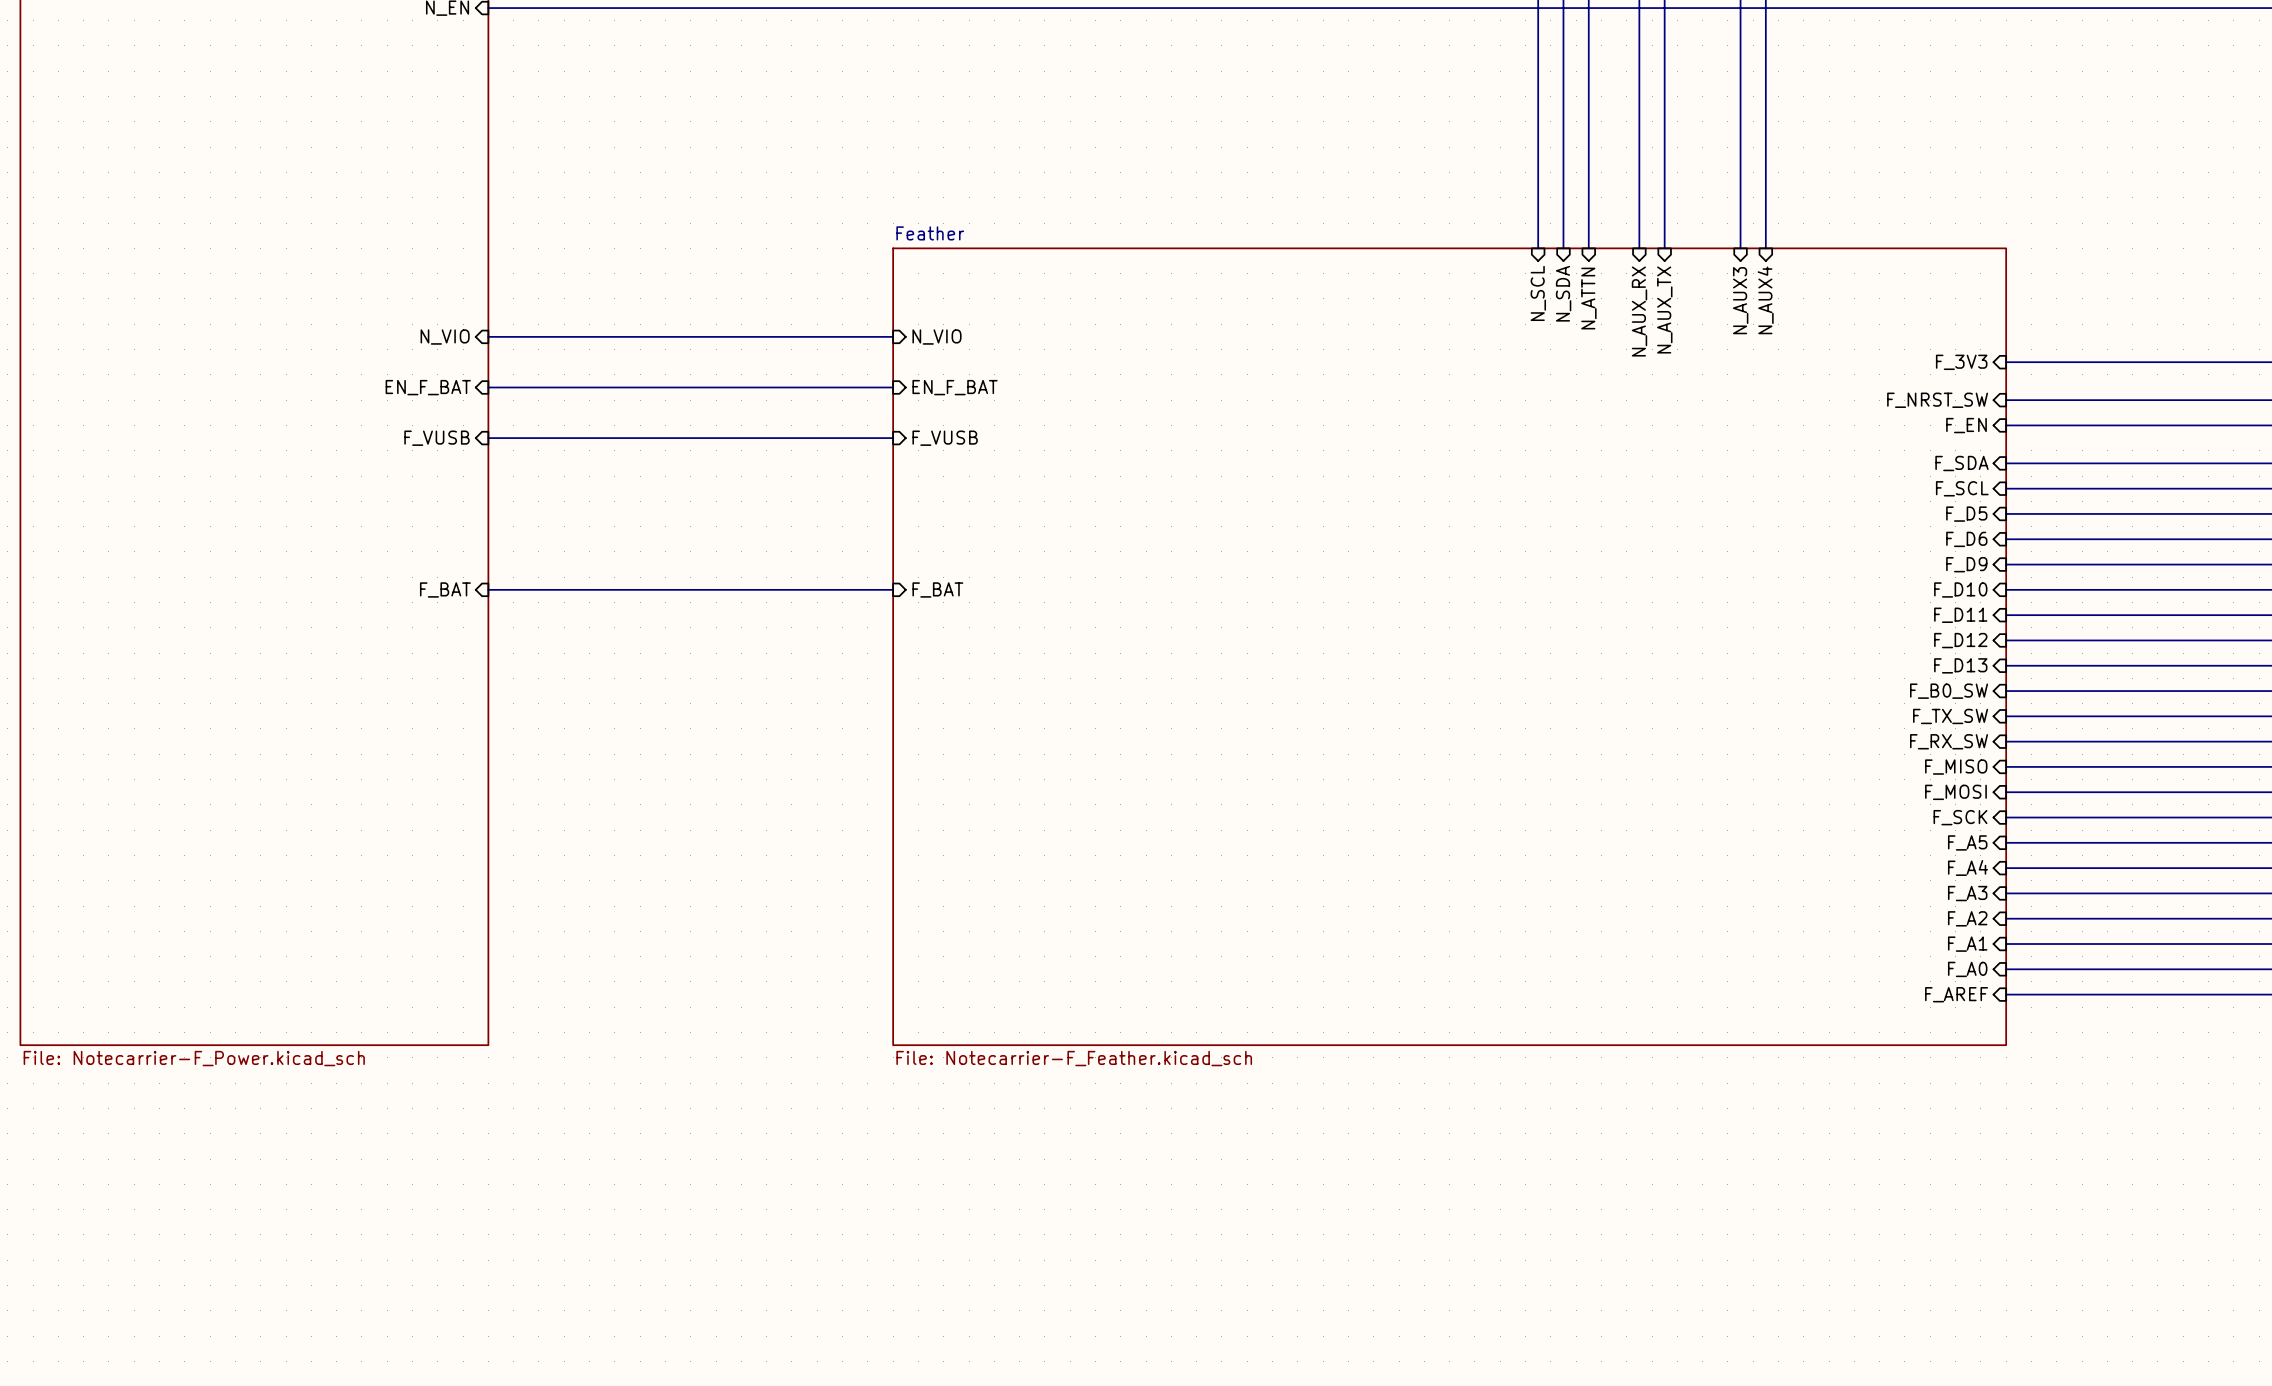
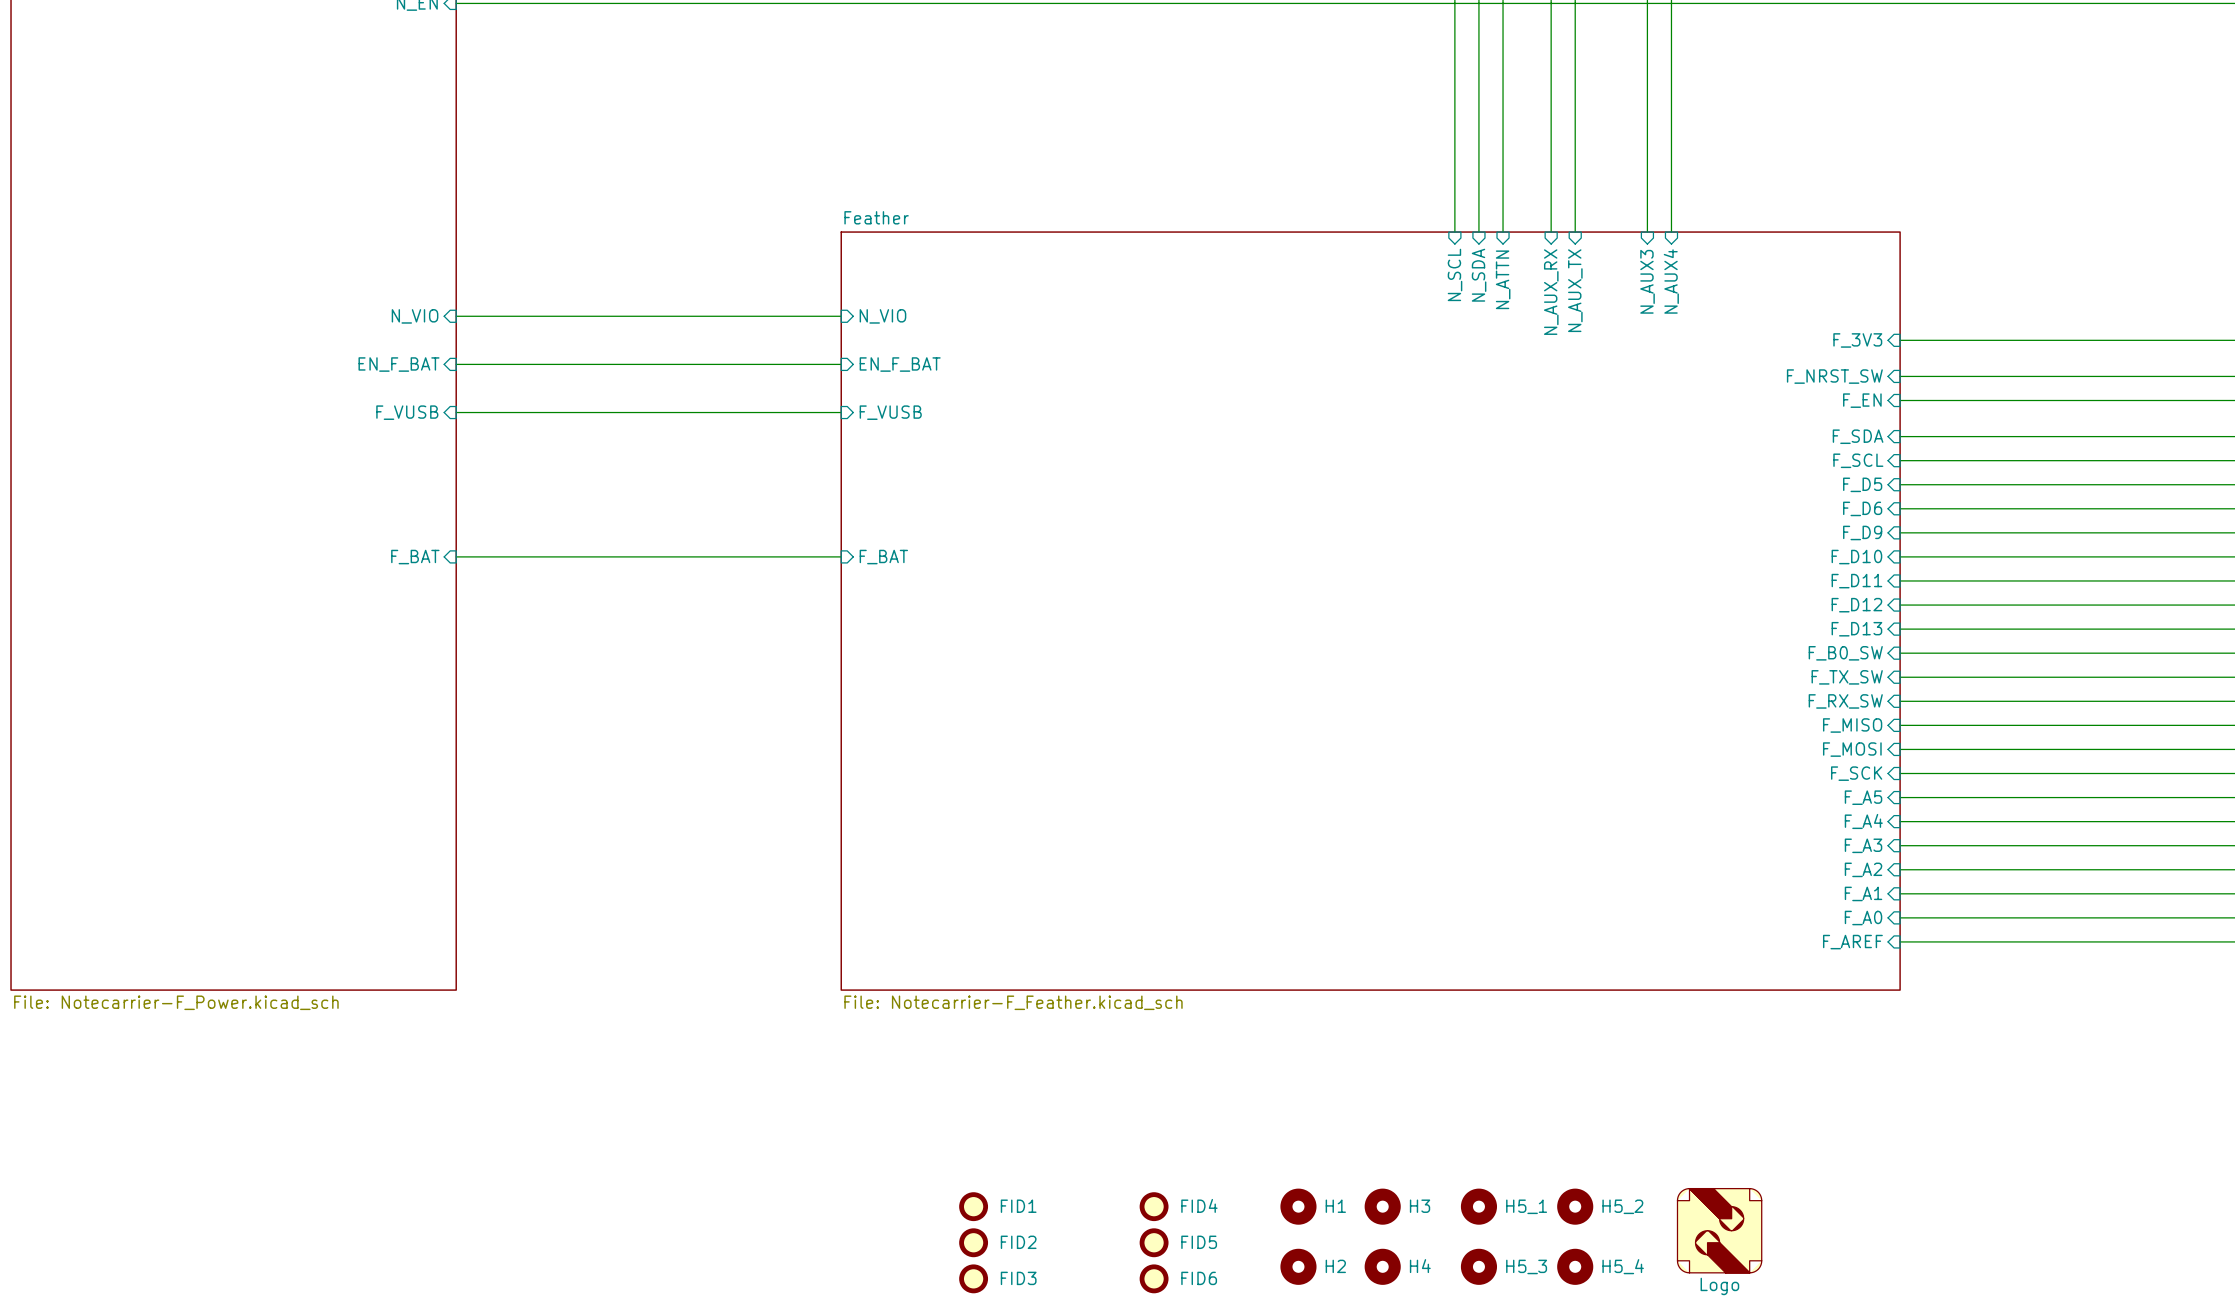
FID1: none -> (973, 1206)
FID4: none -> (1154, 1206)
H1: none -> (1298, 1206)
H3: none -> (1382, 1206)
H5_1: none -> (1478, 1206)
H5_2: none -> (1575, 1206)
part: none -> Logo (1719, 1230)
FID2: none -> (973, 1242)
FID5: none -> (1154, 1242)
H2: none -> (1298, 1266)
H4: none -> (1382, 1266)
H5_3: none -> (1478, 1266)
H5_4: none -> (1575, 1266)
FID3: none -> (973, 1278)
FID6: none -> (1154, 1278)

